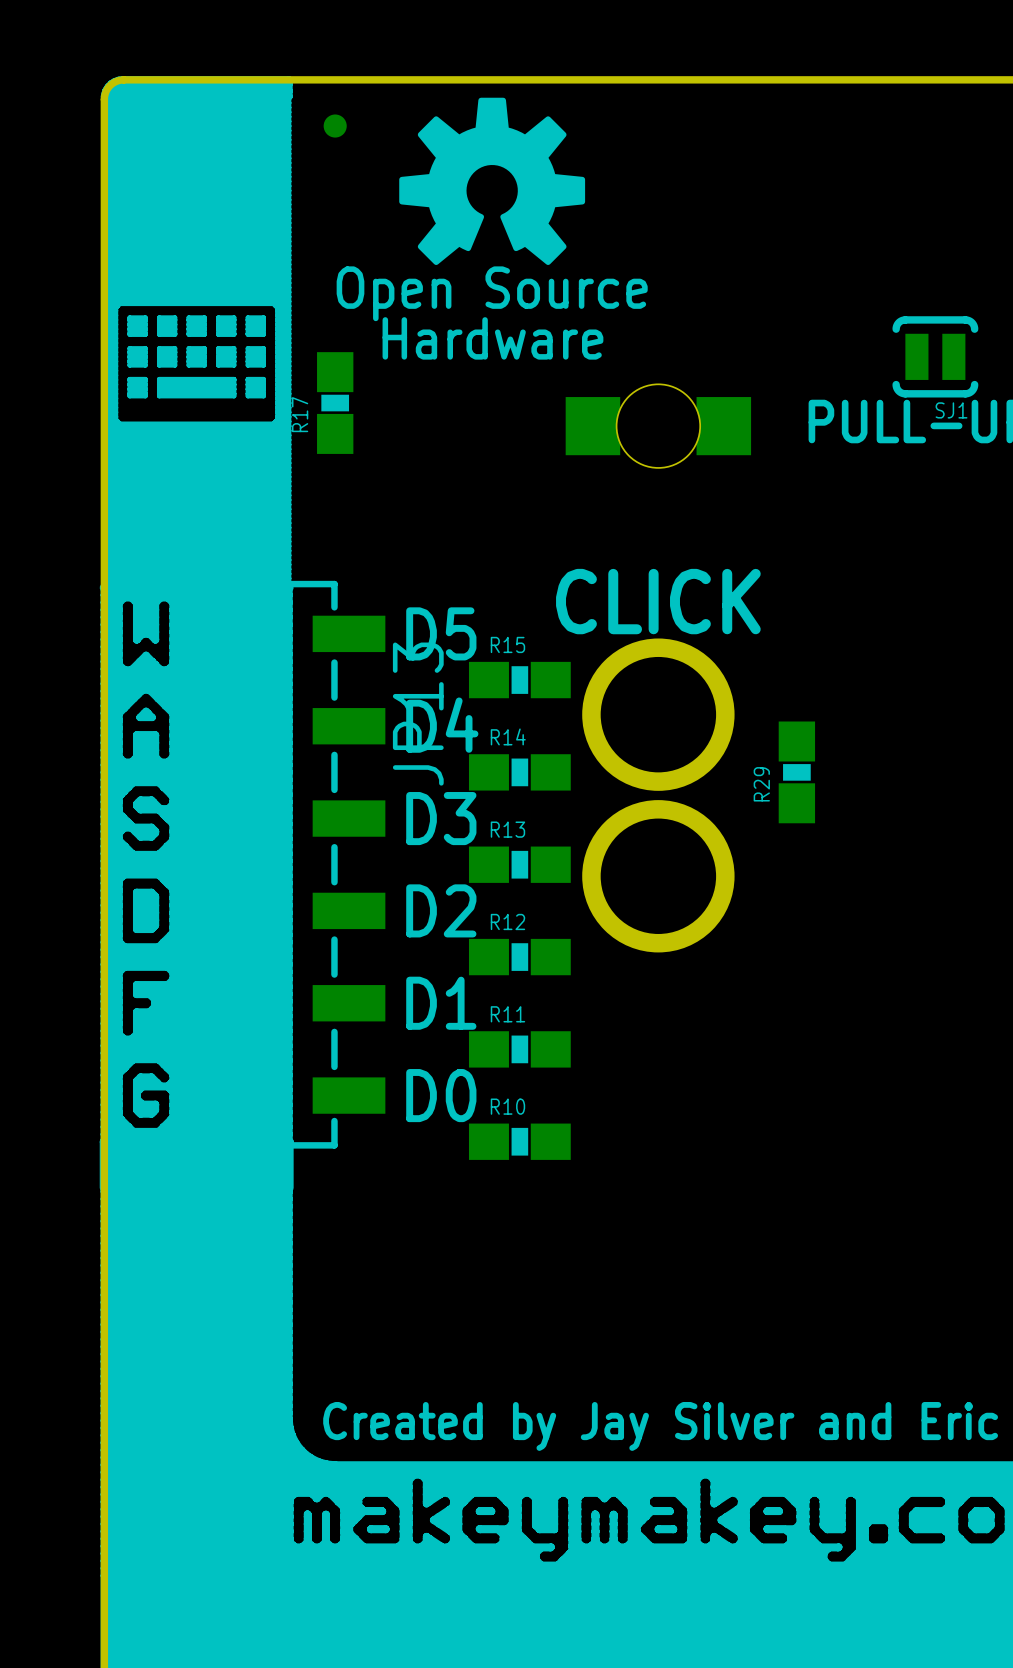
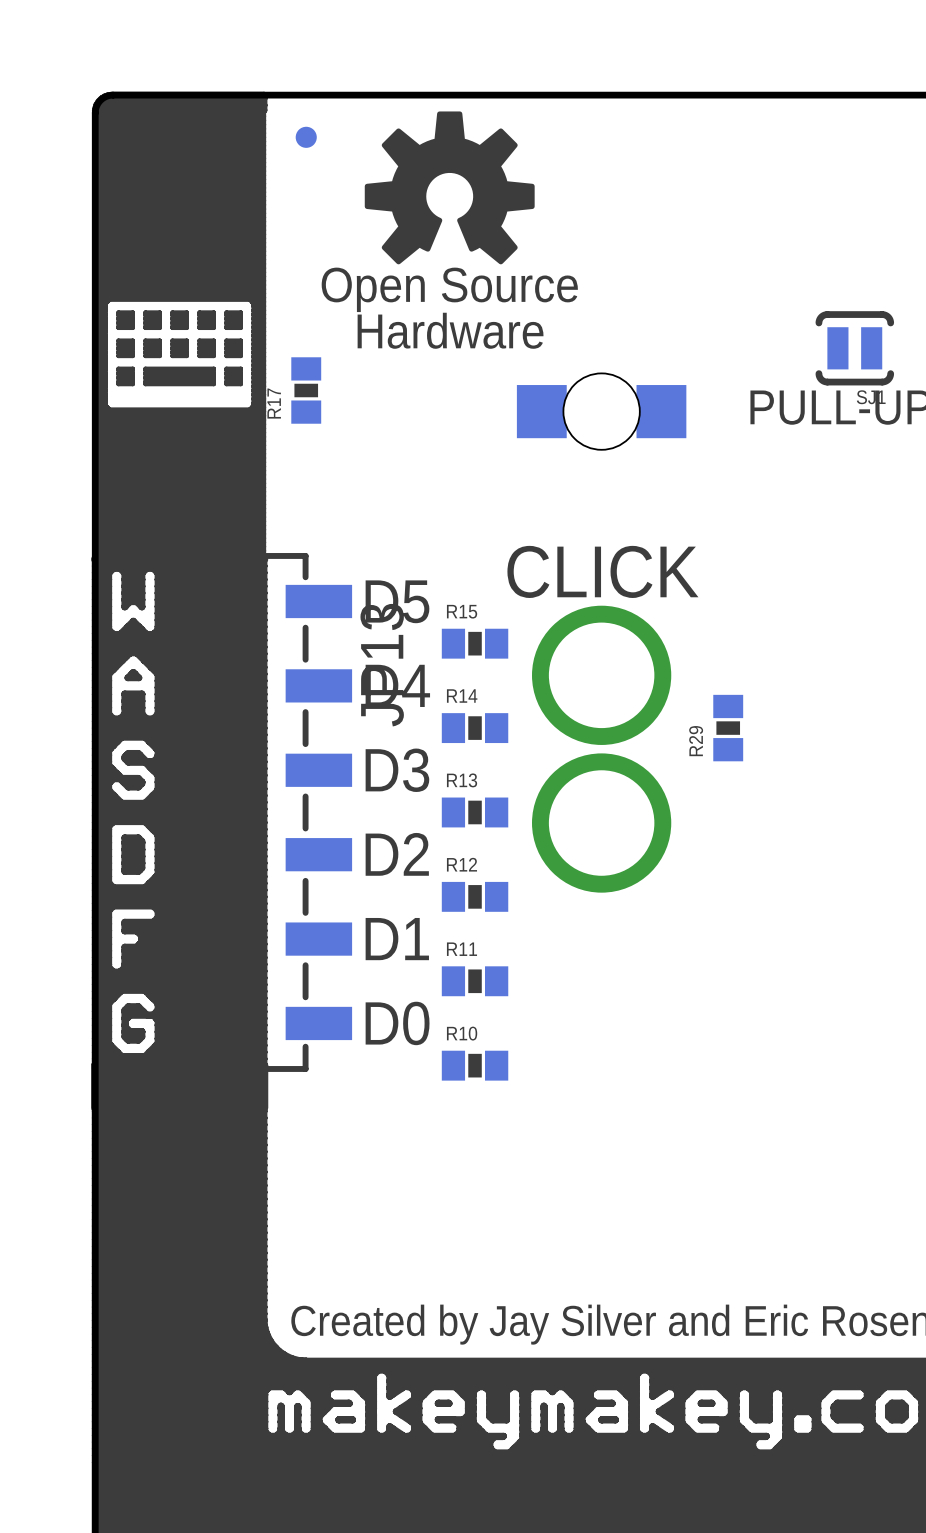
R17 footprint: [317, 352, 354, 454] -> [291, 357, 322, 424]
R15 footprint: [468, 661, 571, 699] -> [441, 628, 509, 659]
R29 footprint: [778, 721, 816, 824] -> [713, 694, 744, 762]
R14 footprint: [468, 754, 571, 791] -> [441, 713, 509, 744]
R13 footprint: [468, 846, 571, 883] -> [441, 797, 509, 828]
R12 footprint: [468, 938, 571, 976] -> [441, 881, 509, 912]
R11 footprint: [468, 1031, 571, 1068] -> [441, 966, 509, 997]
R10 footprint: [468, 1123, 571, 1160] -> [441, 1050, 509, 1081]

